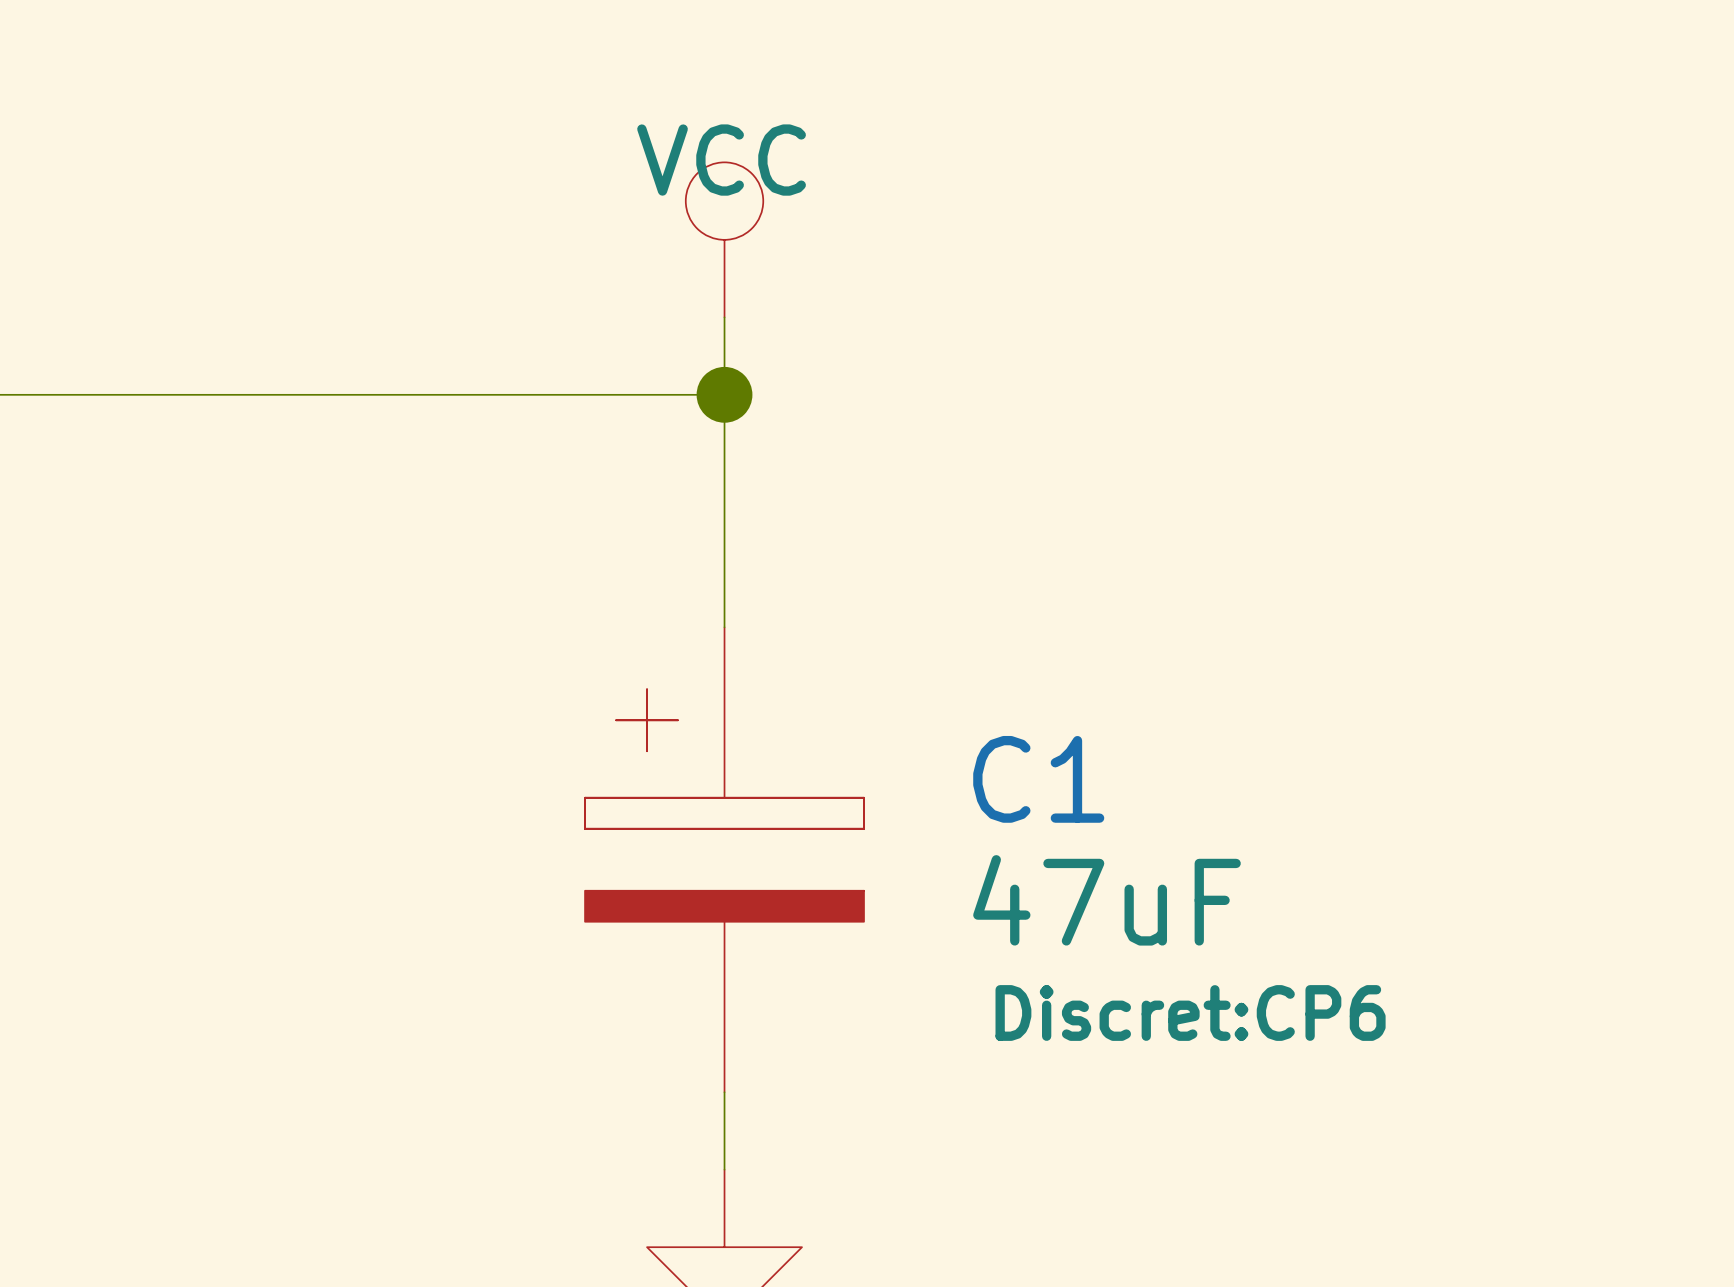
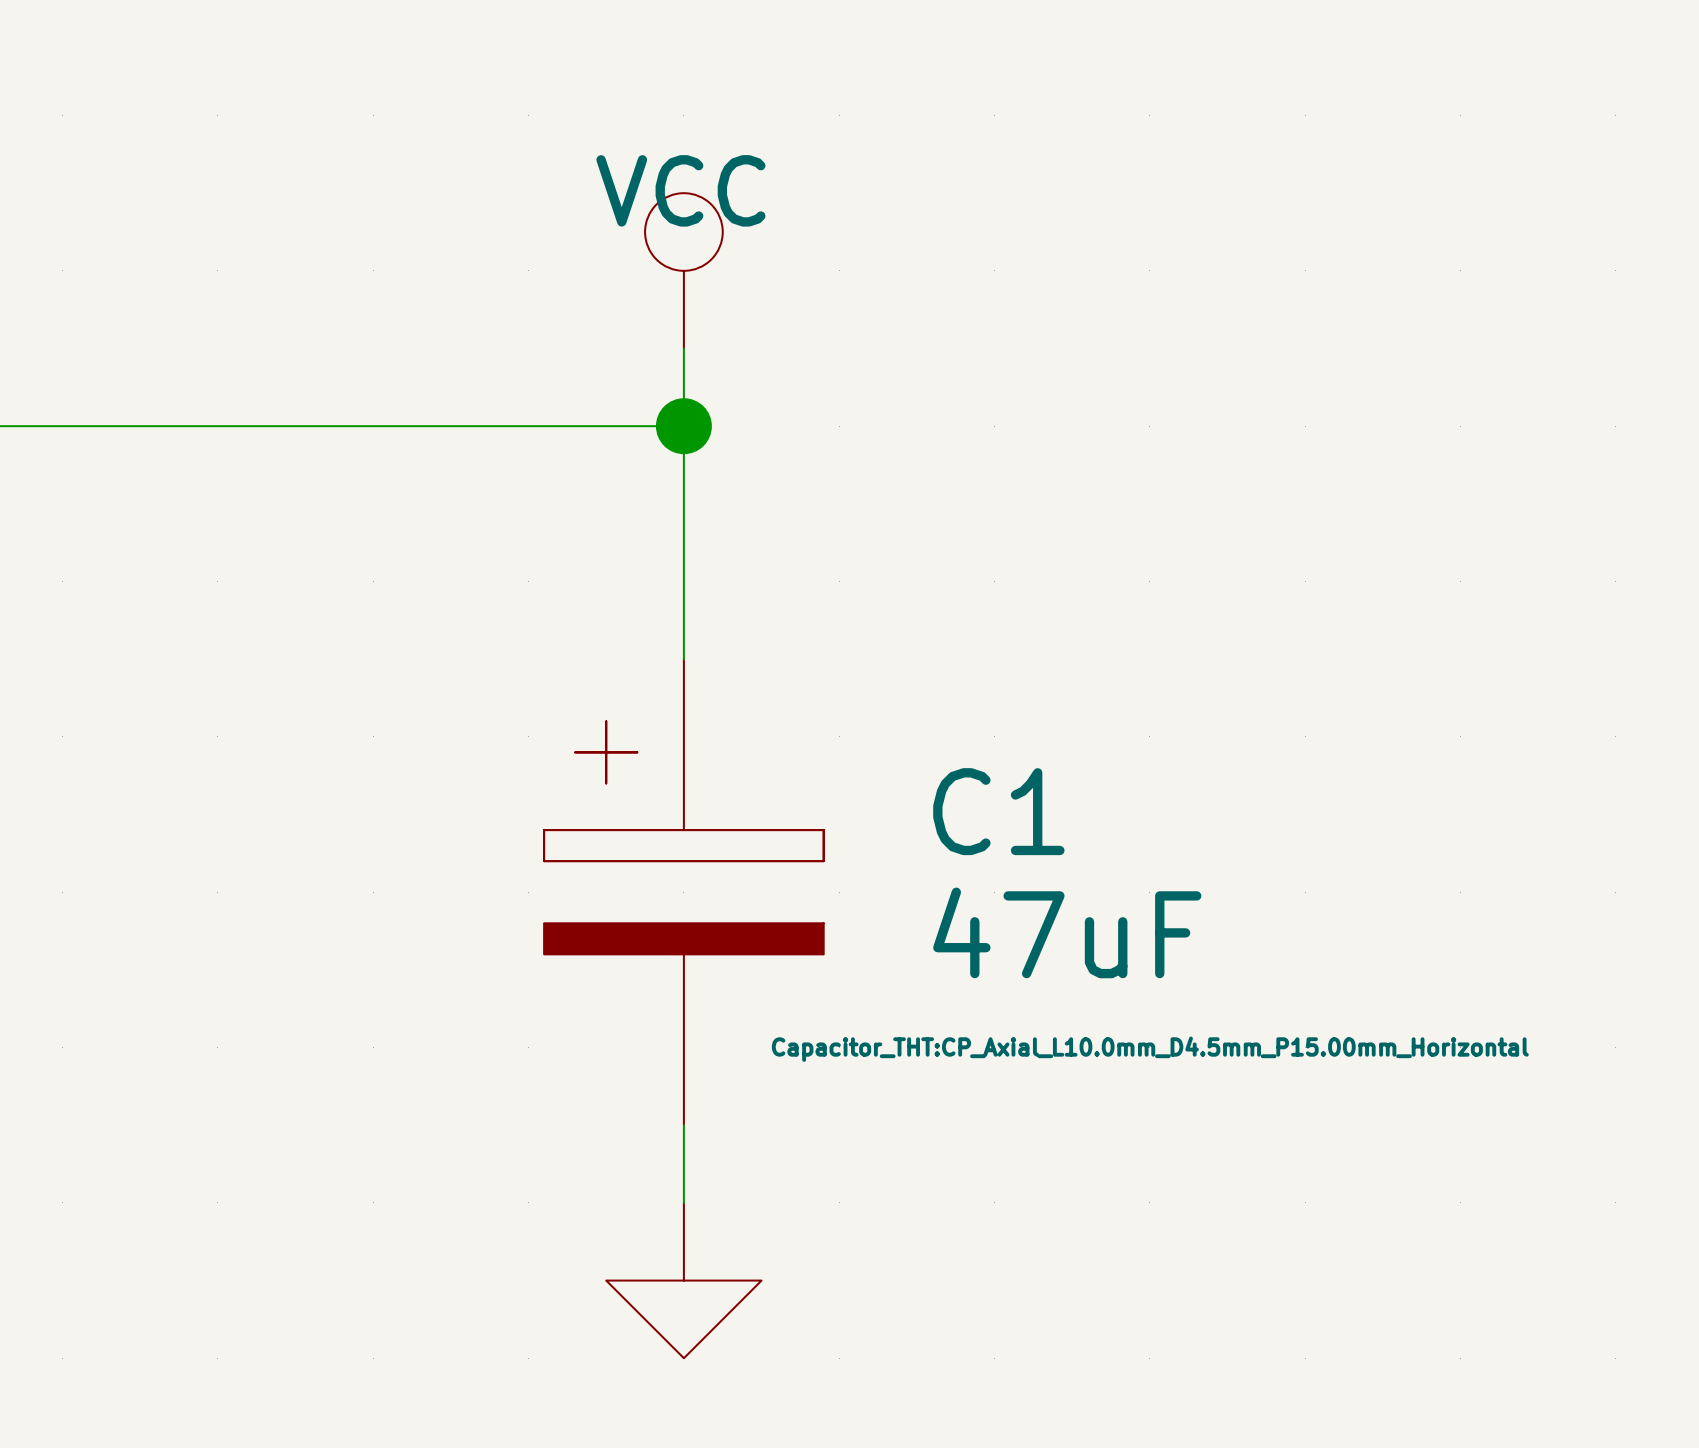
C1 text: Discret:CP6 (1190, 1012) -> Capacitor_THT:CP_Axial_L10.0mm_D4.5mm_P15.00mm_Horizontal (1150, 1049)

